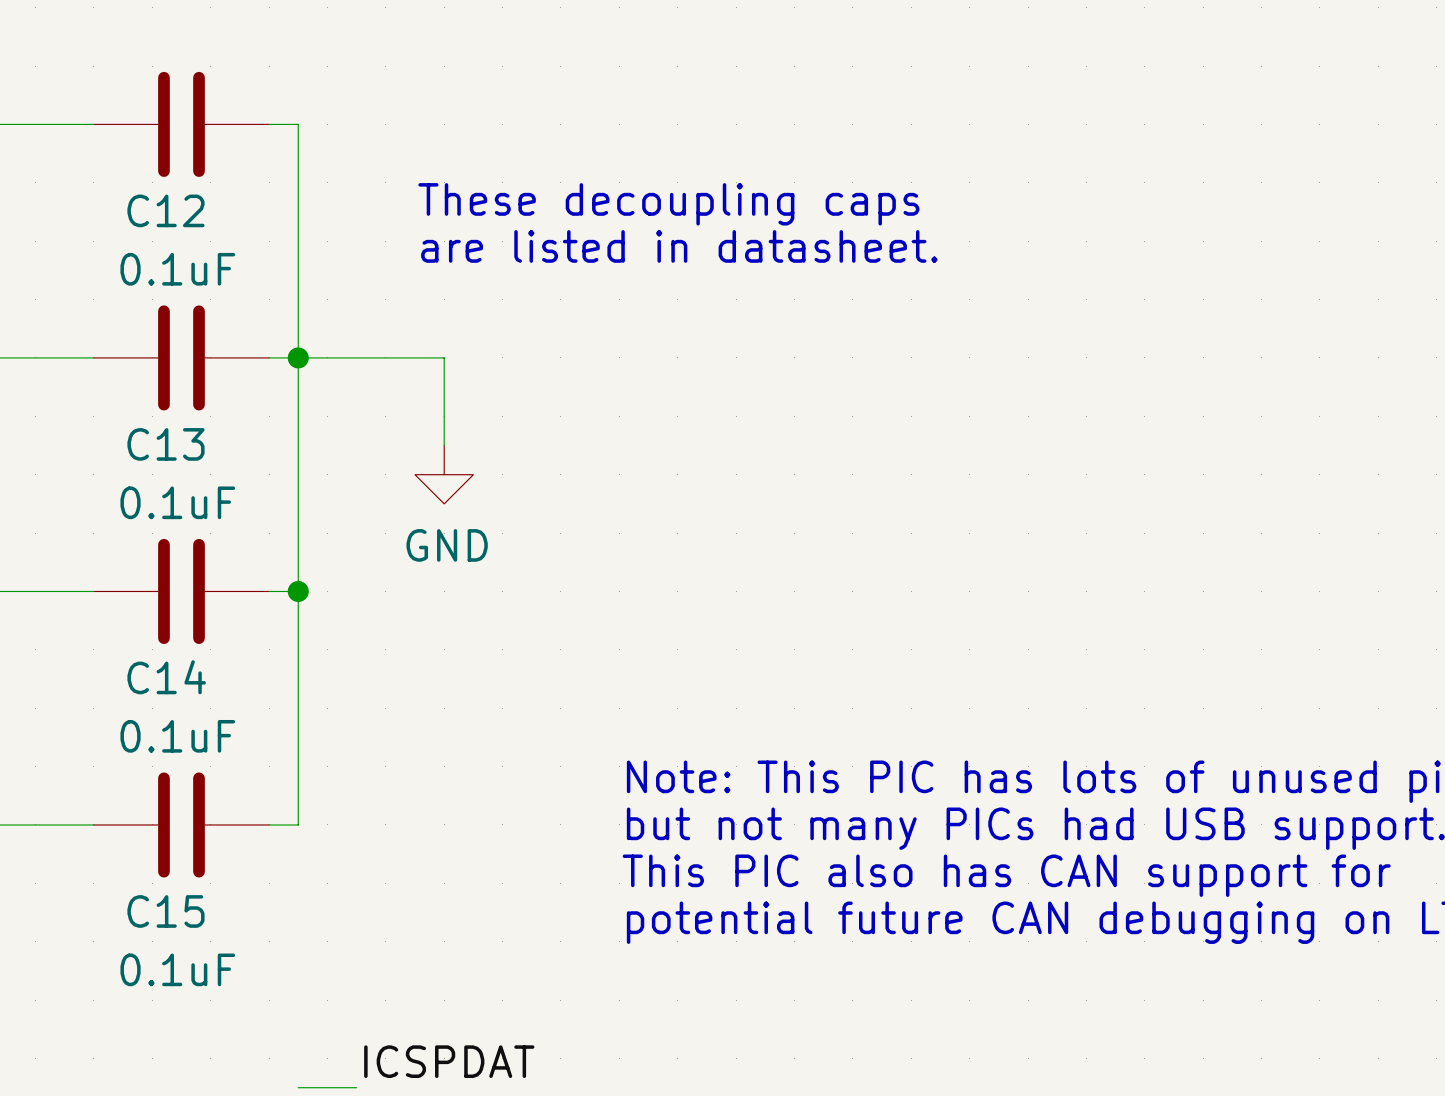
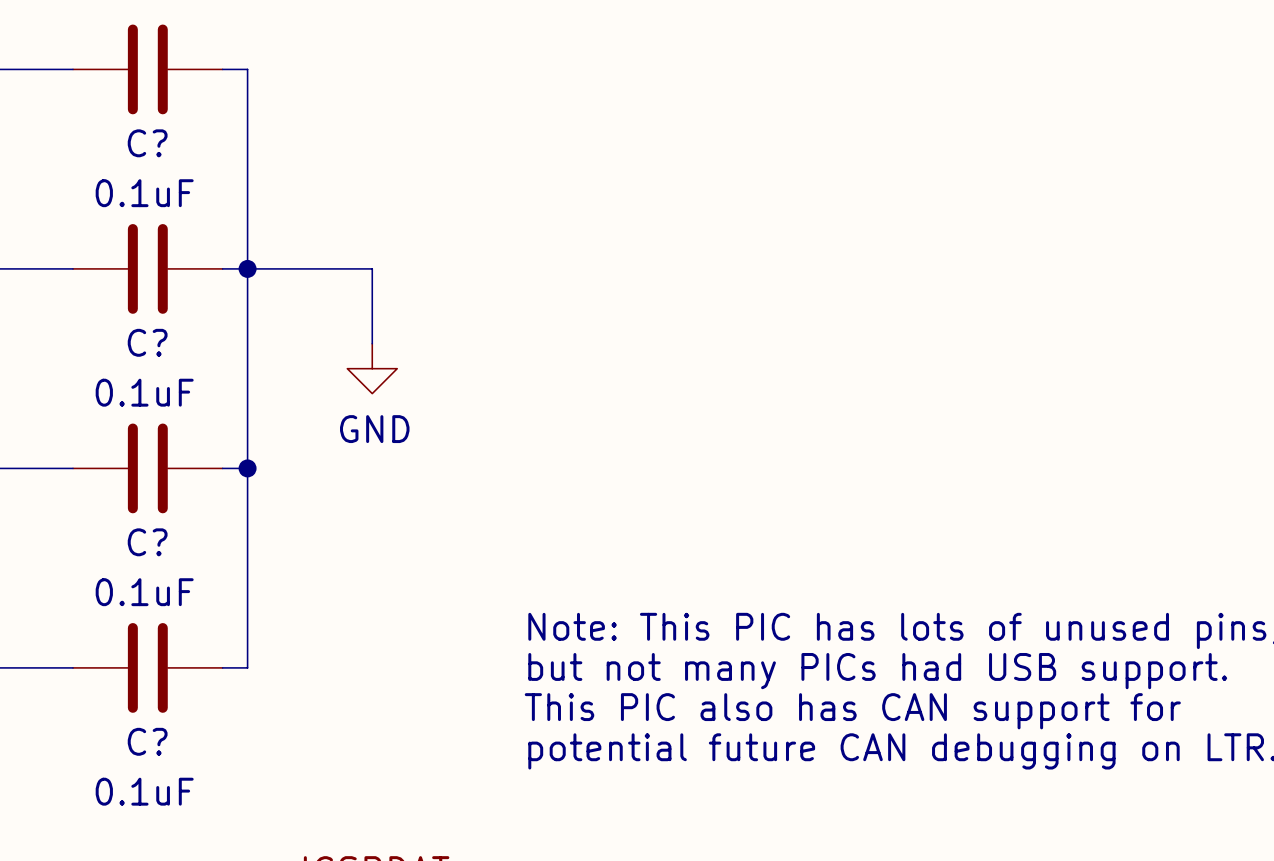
text: These decoupling caps (668, 204) -> none
C12 name: C12 (165, 210) -> C? (147, 143)
text: are listed in datasheet. (679, 246) -> none
C13 name: C13 (165, 444) -> C? (147, 342)
C14 name: C14 (166, 677) -> C? (147, 542)
C15 name: C15 (165, 911) -> C? (147, 741)

